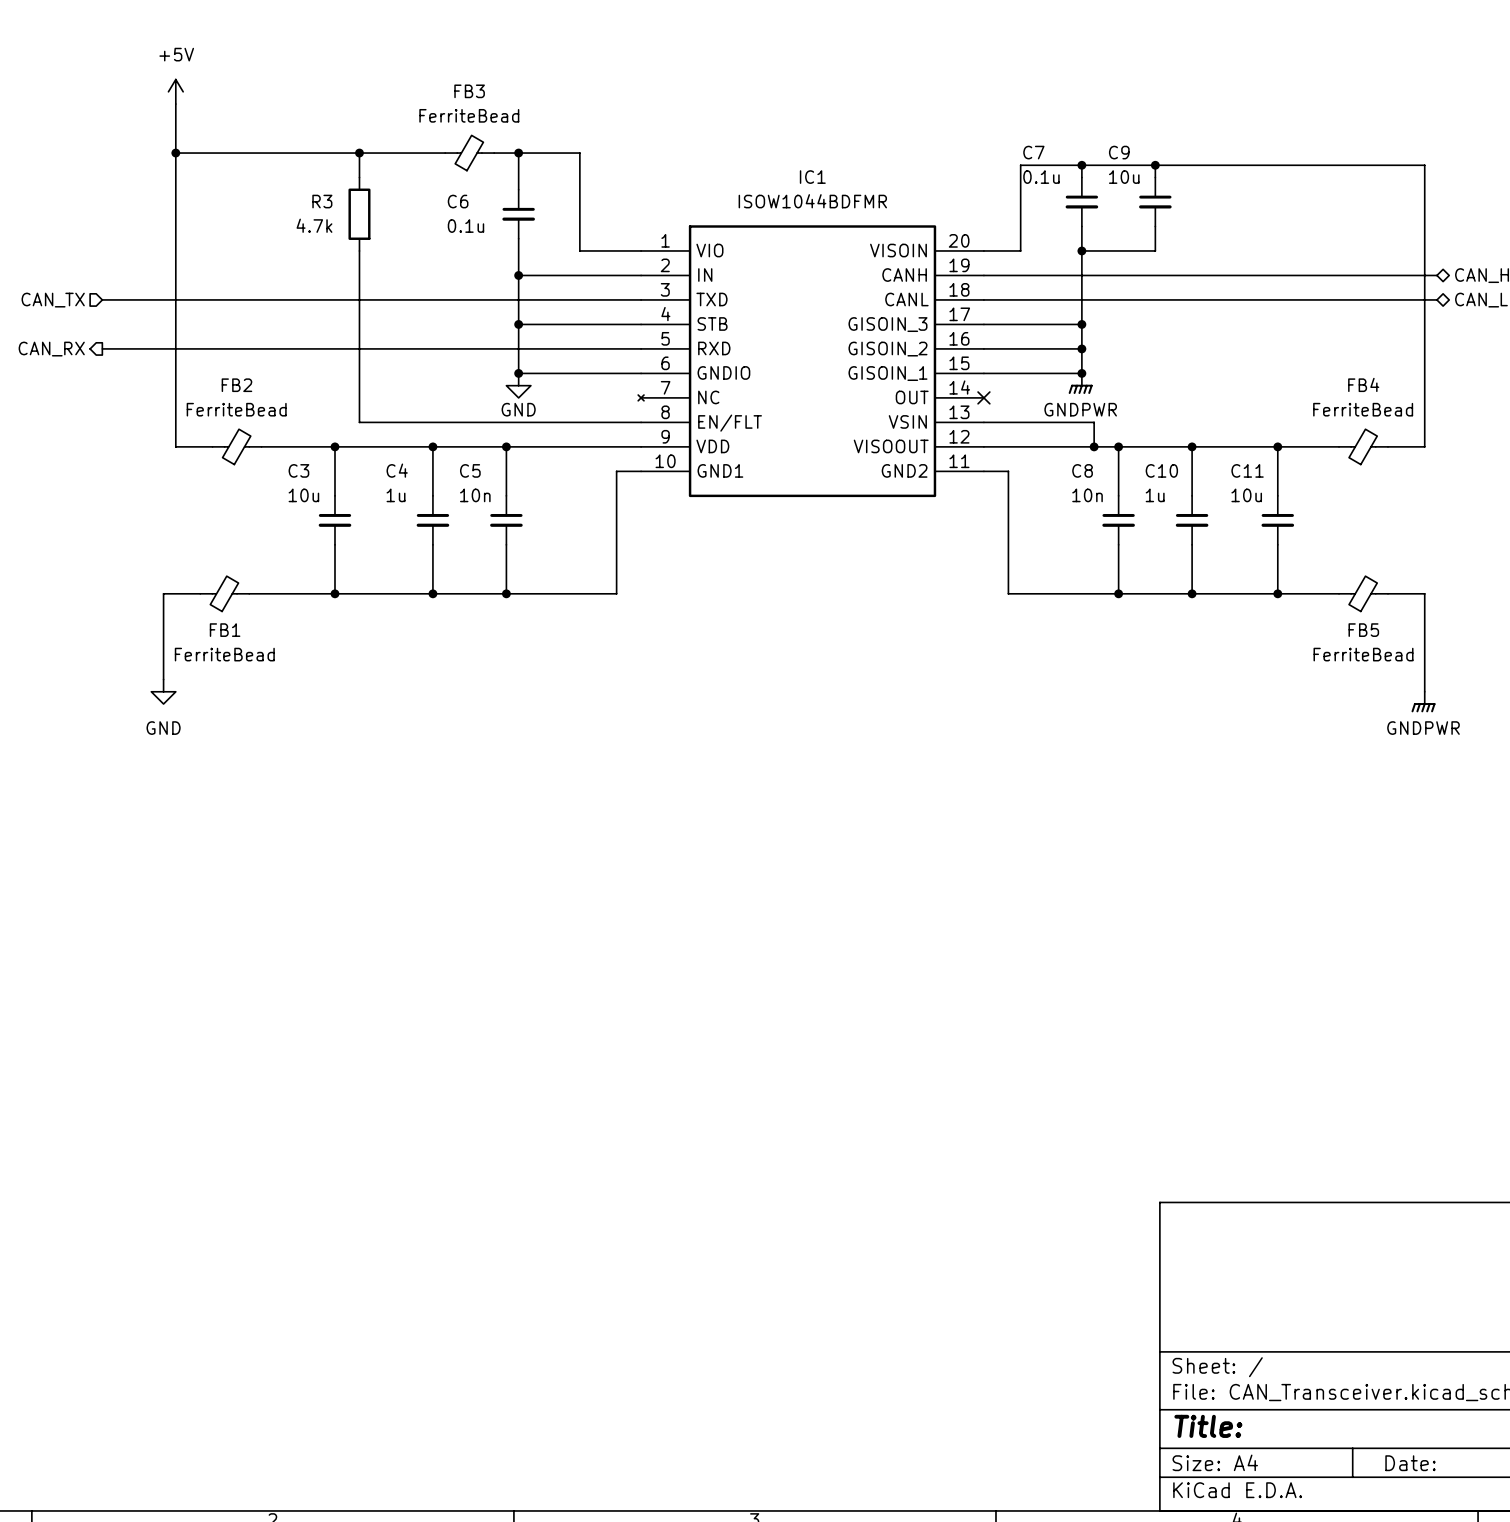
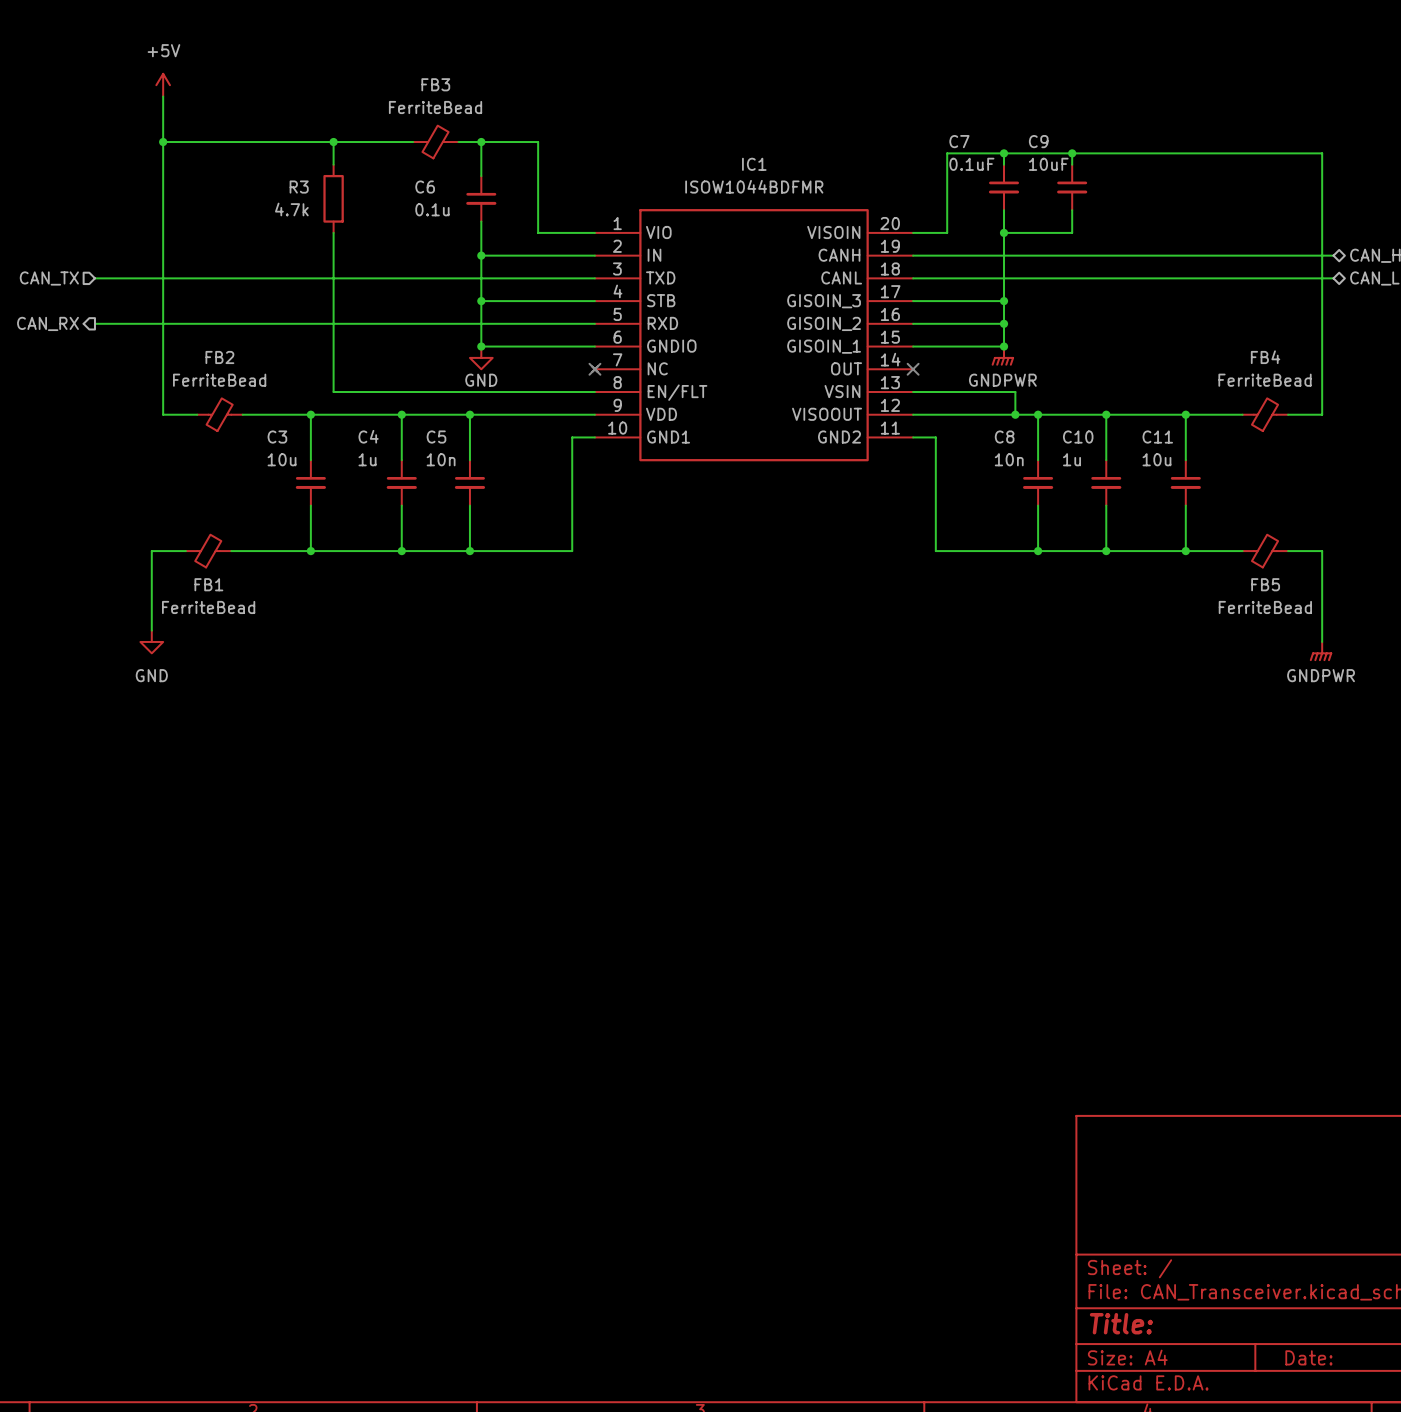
C7 value: 0.1u (1041, 177) -> 0.1uF (971, 164)
C9 value: 10u (1124, 177) -> 10uF (1048, 164)
no-connect mark: none -> (594, 369)

